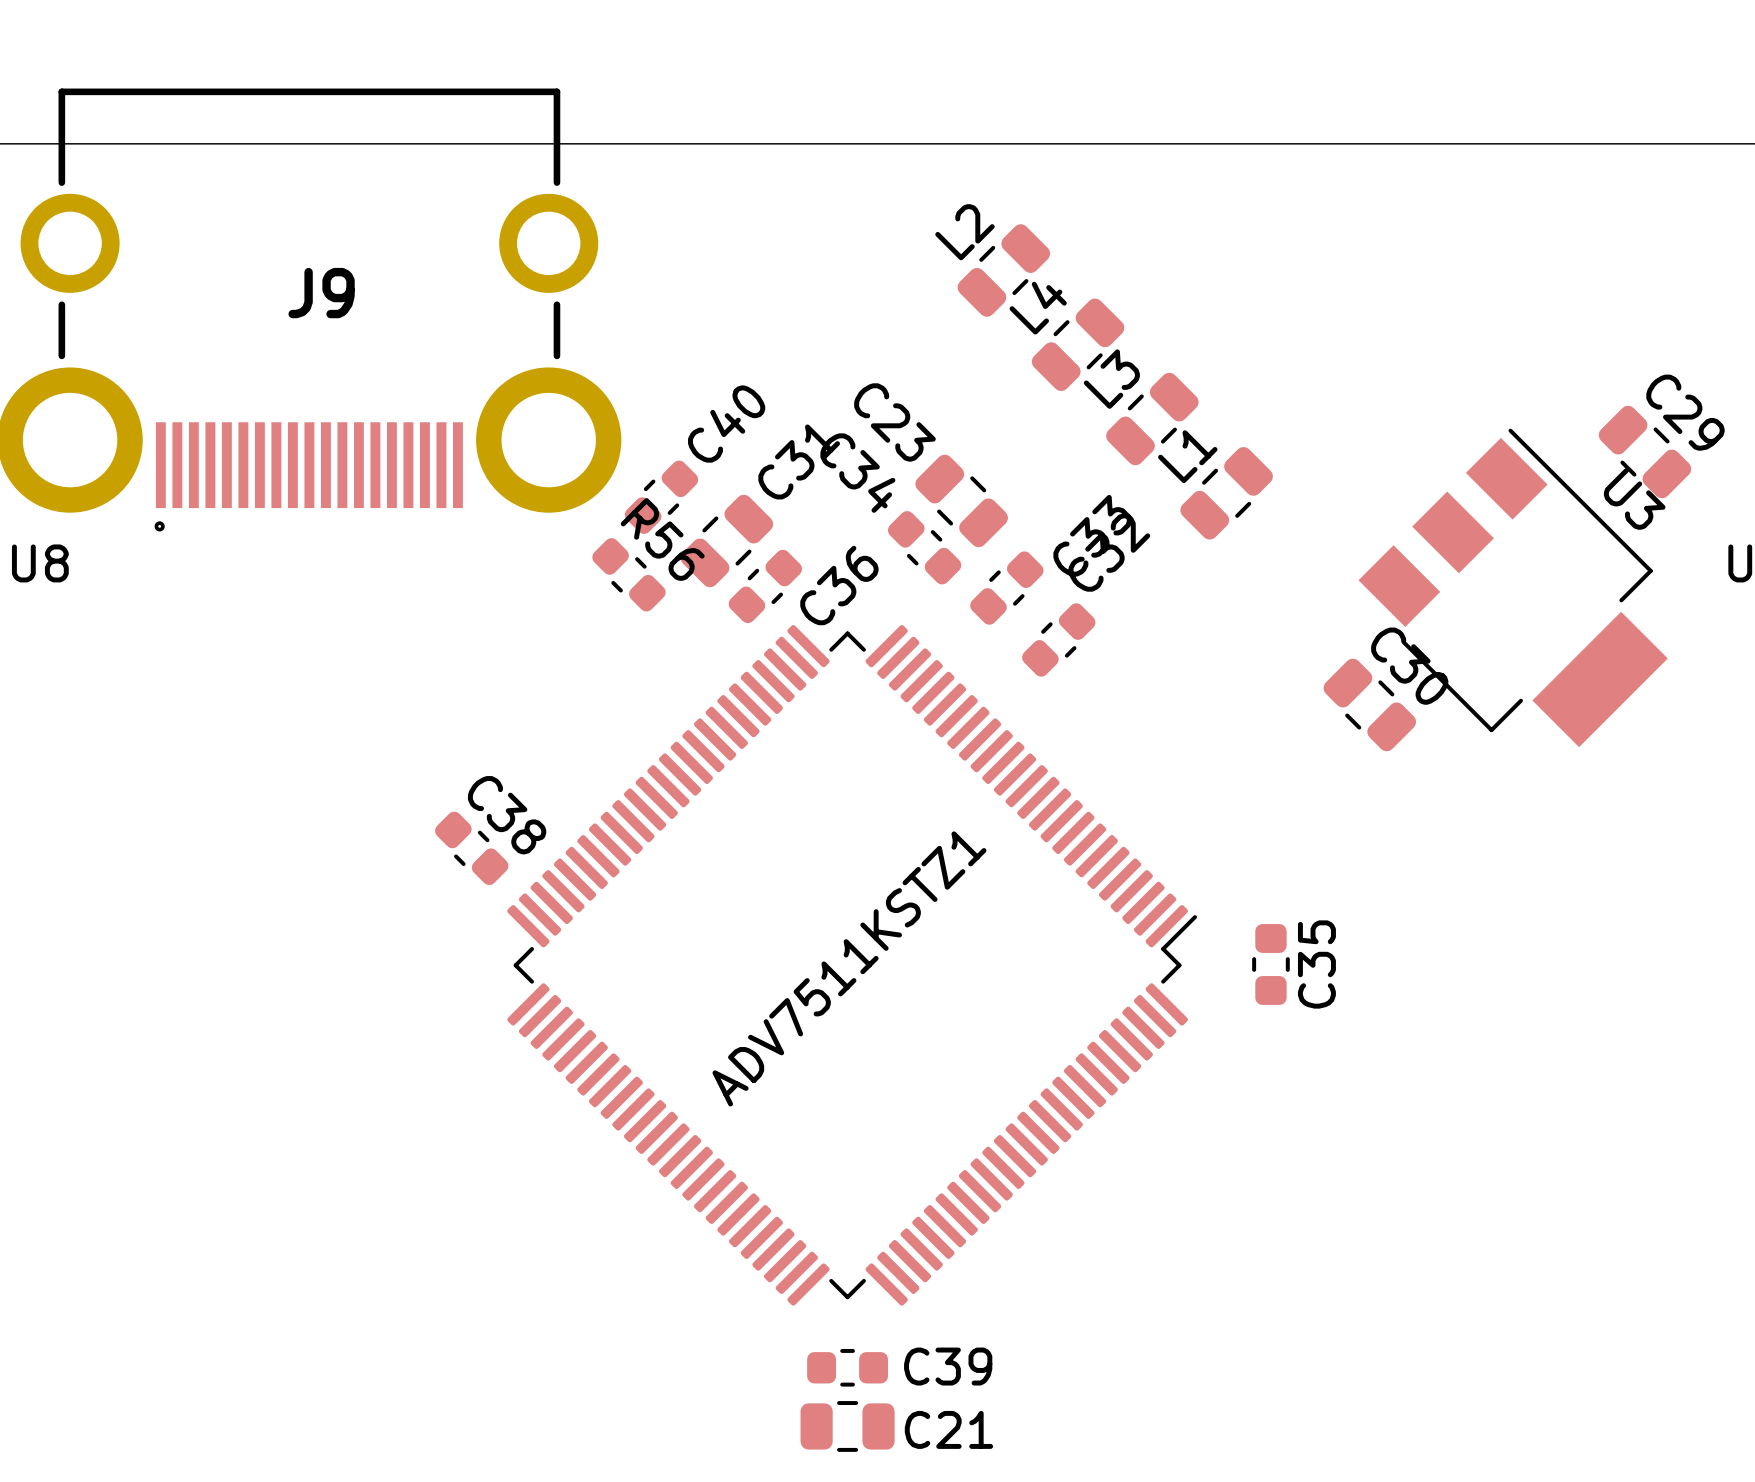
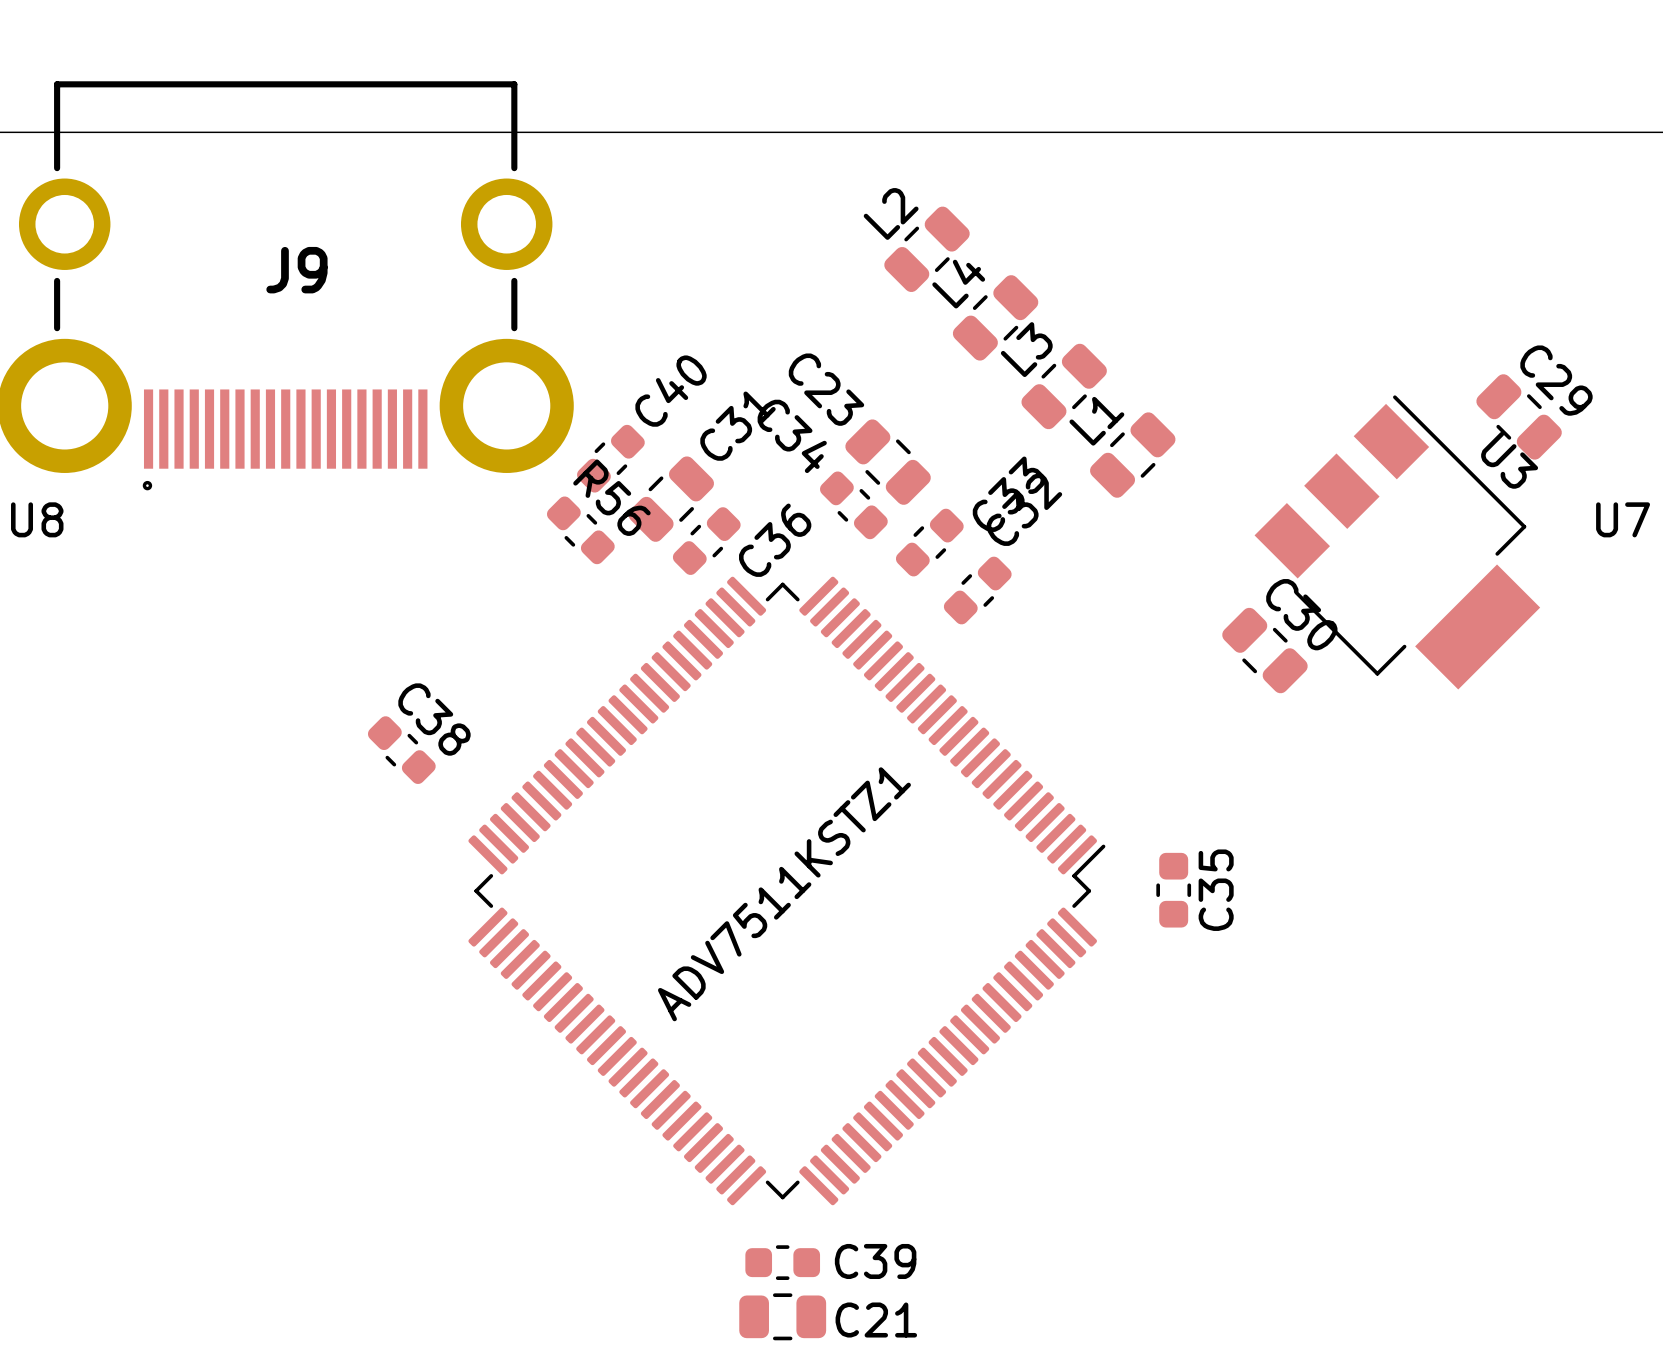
C38 position: (471, 848) -> (401, 750)

